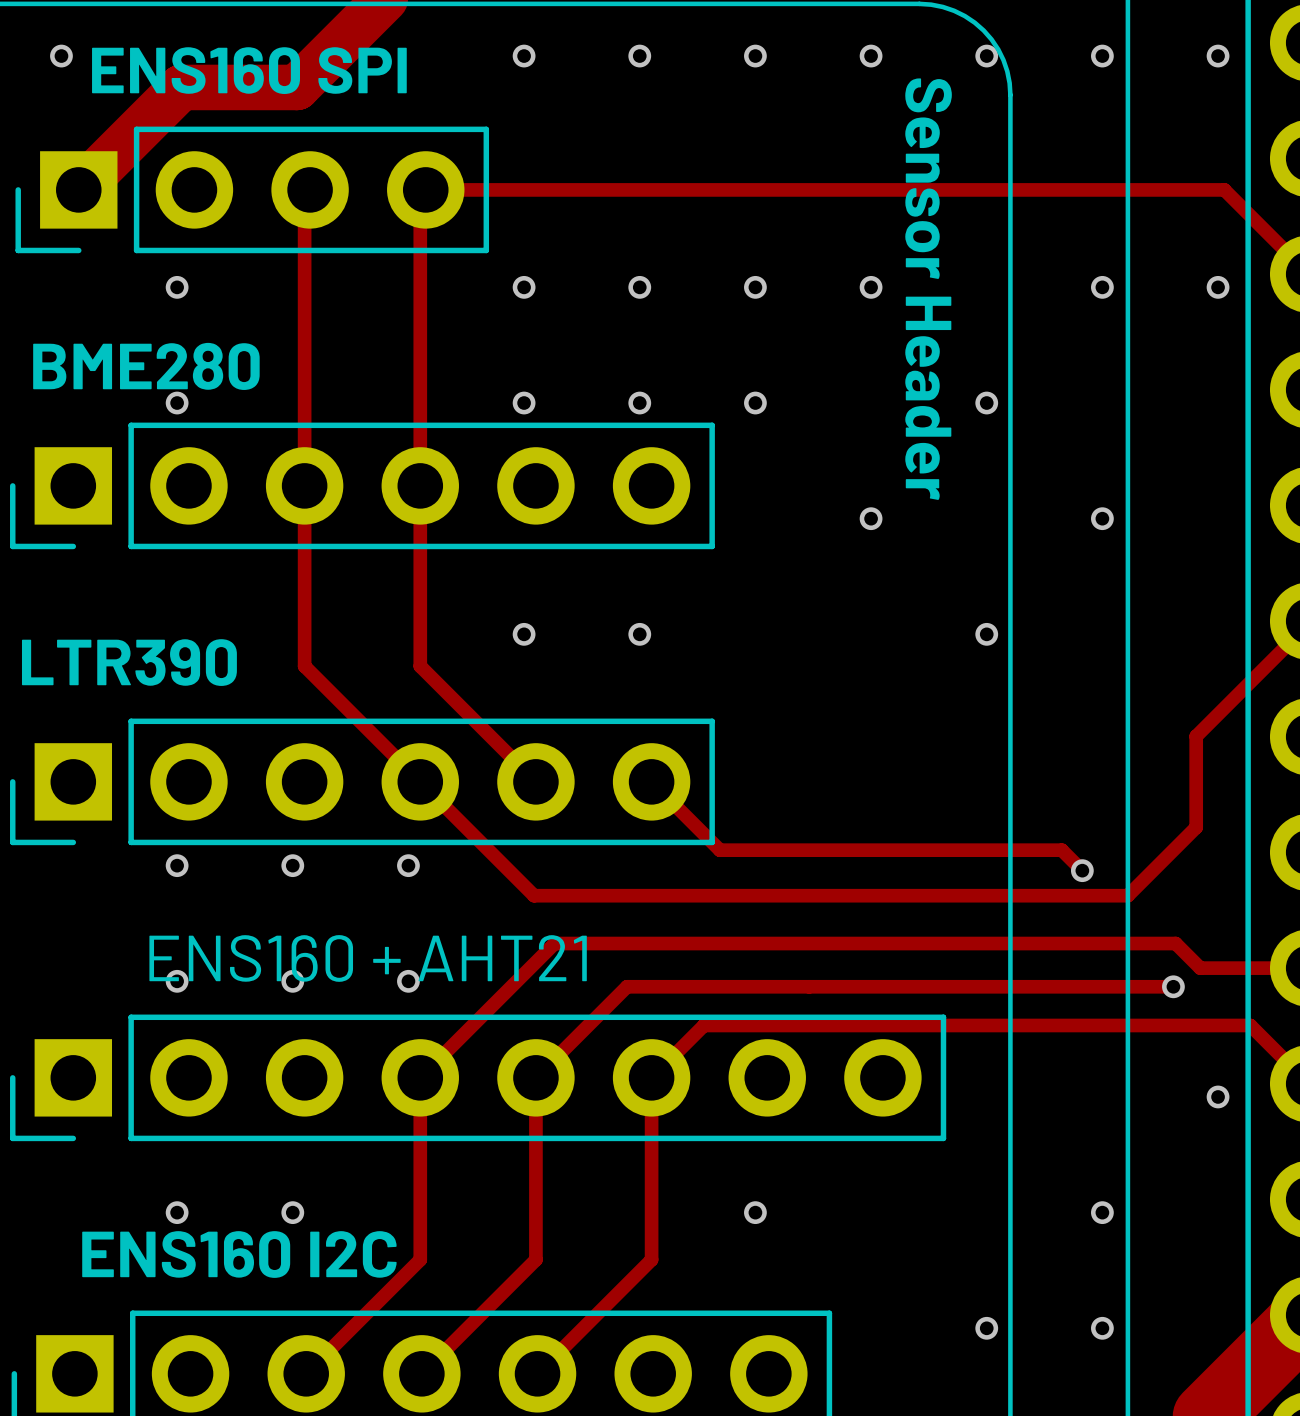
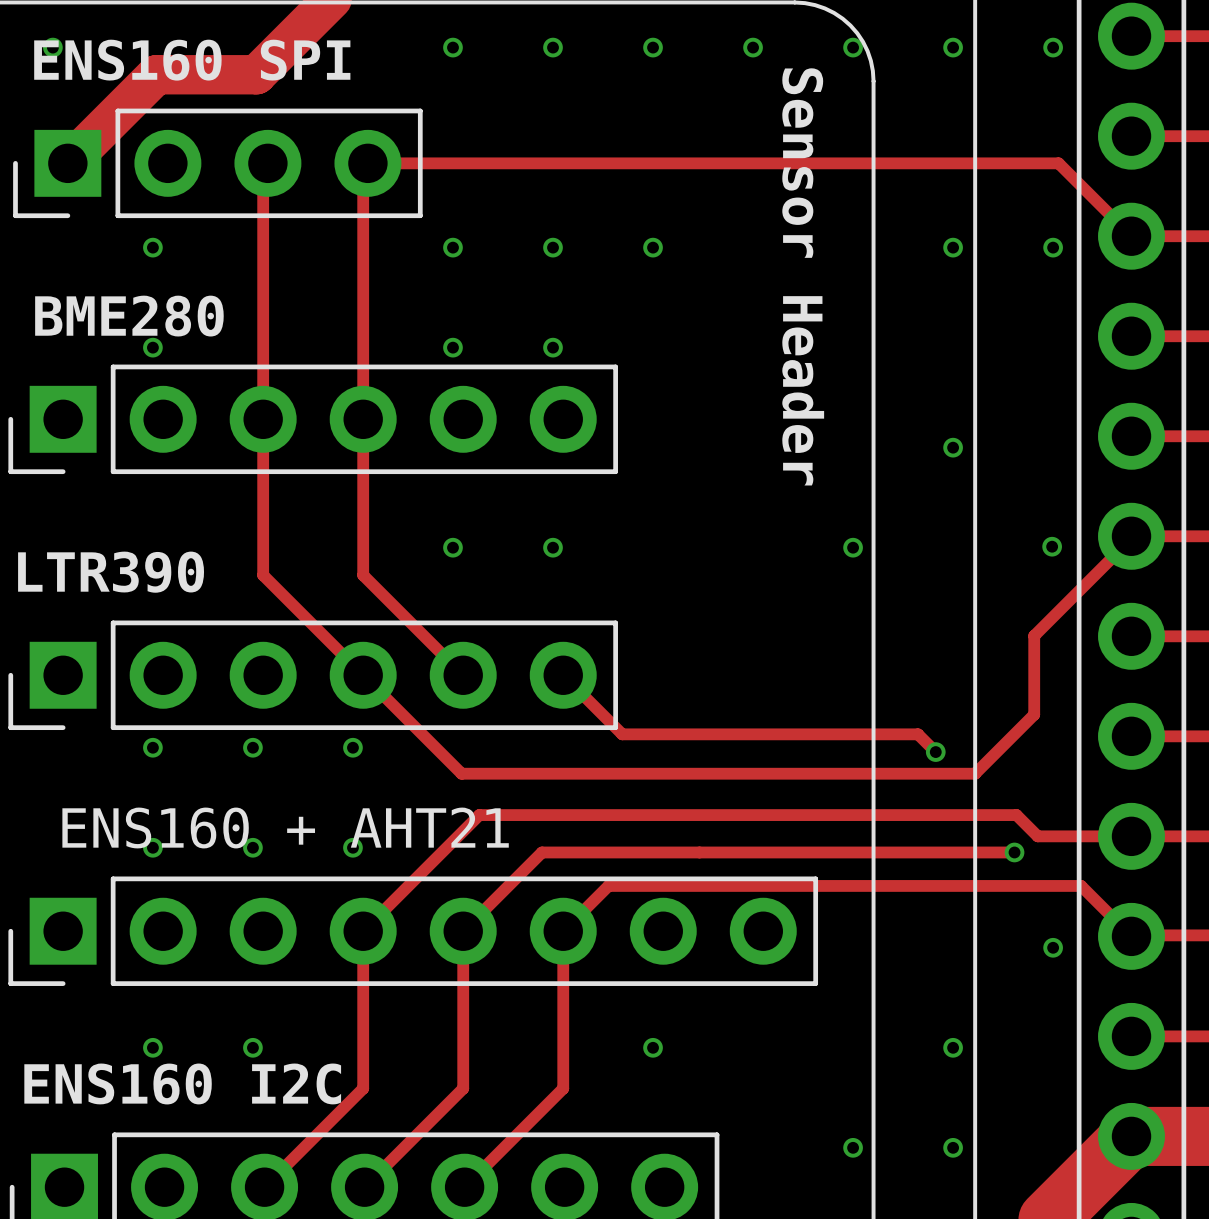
via: (871, 287) -> none
via: (755, 403) -> none
via: (986, 403) -> none
via: (871, 518) -> none
via: none -> (1052, 546)

